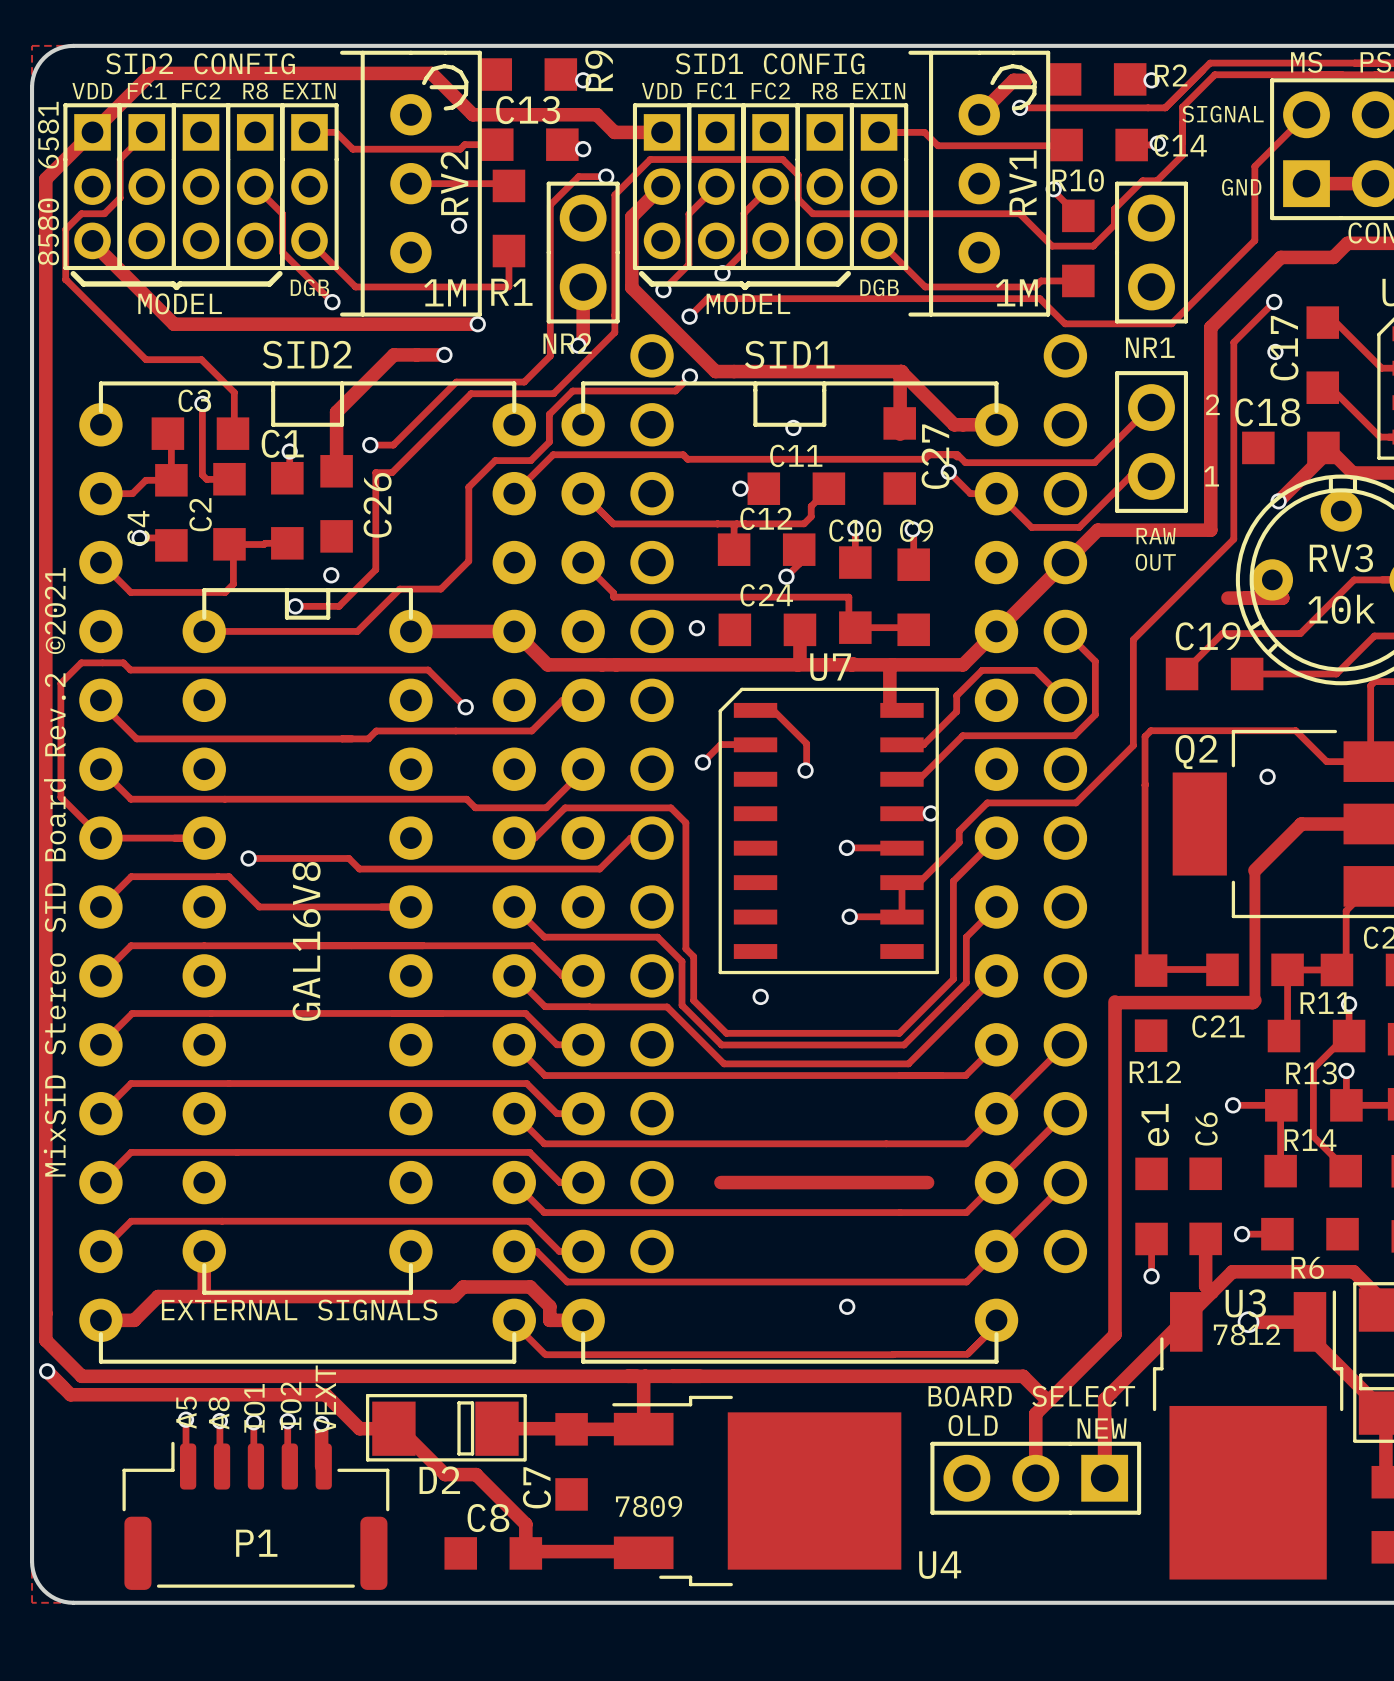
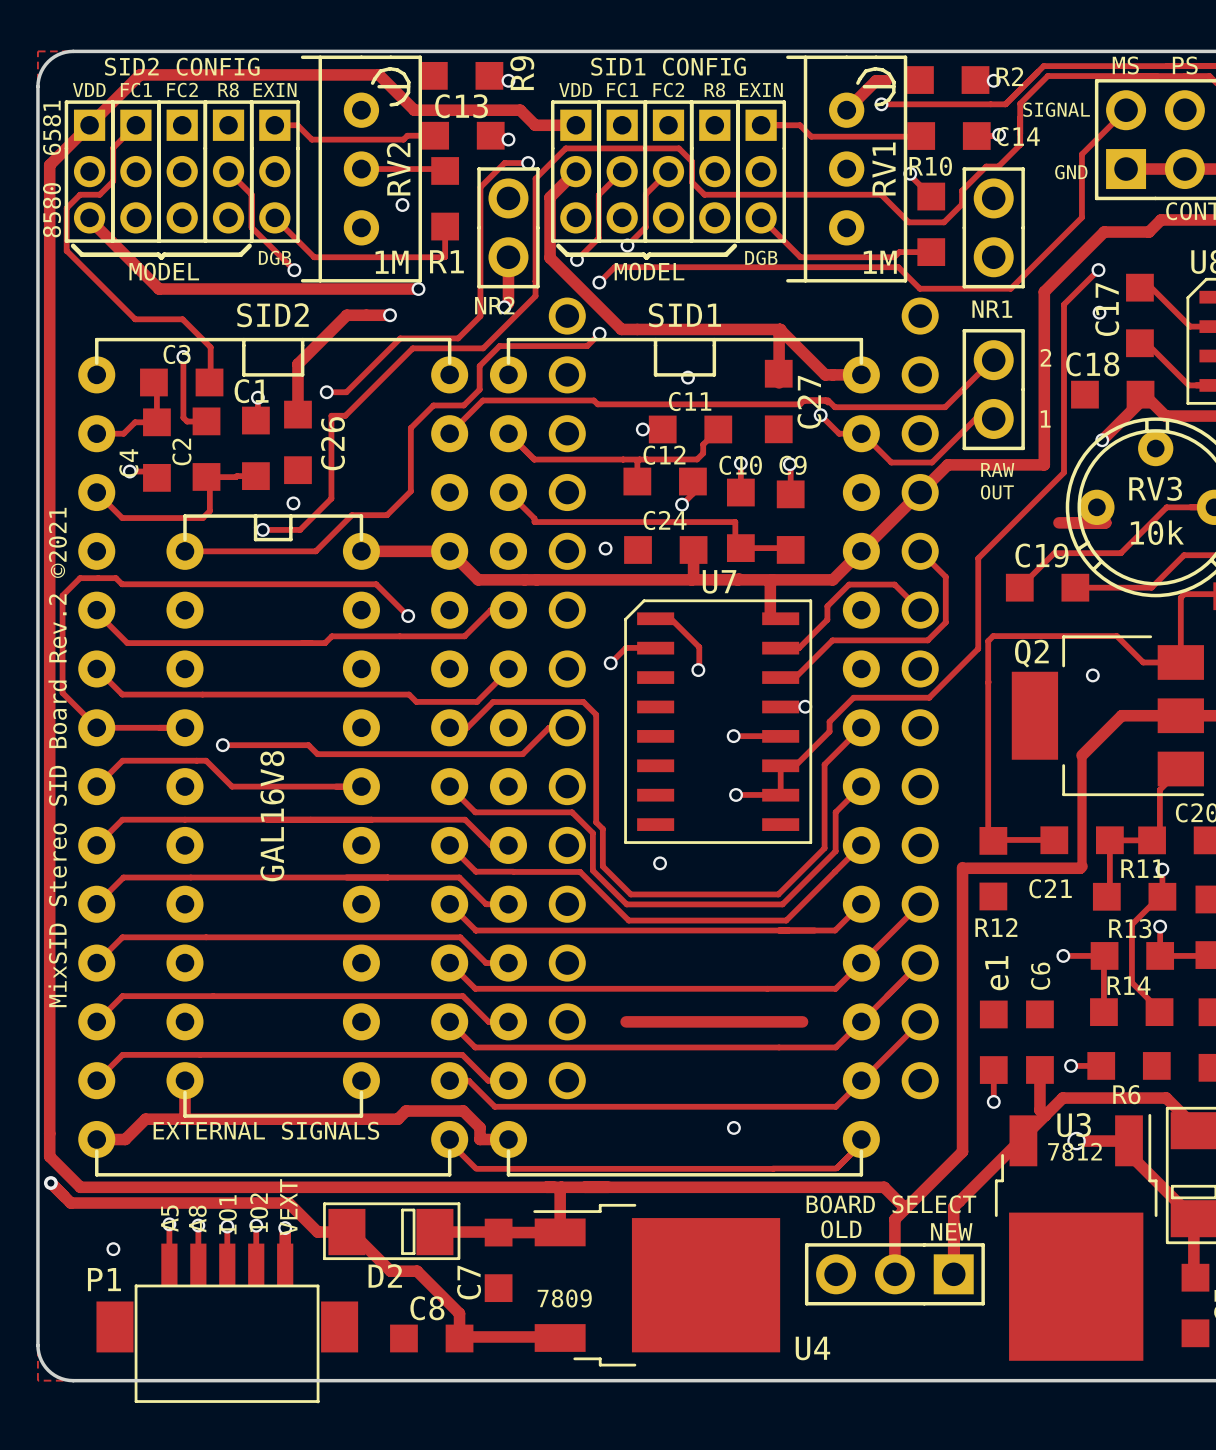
via position: (47, 1371) -> (113, 1249)
via: none -> (50, 1183)
P1 footprint: [122, 1441, 390, 1590] -> [96, 1243, 359, 1404]
P1 name position: P1 (256, 1543) -> P1 (104, 1279)

